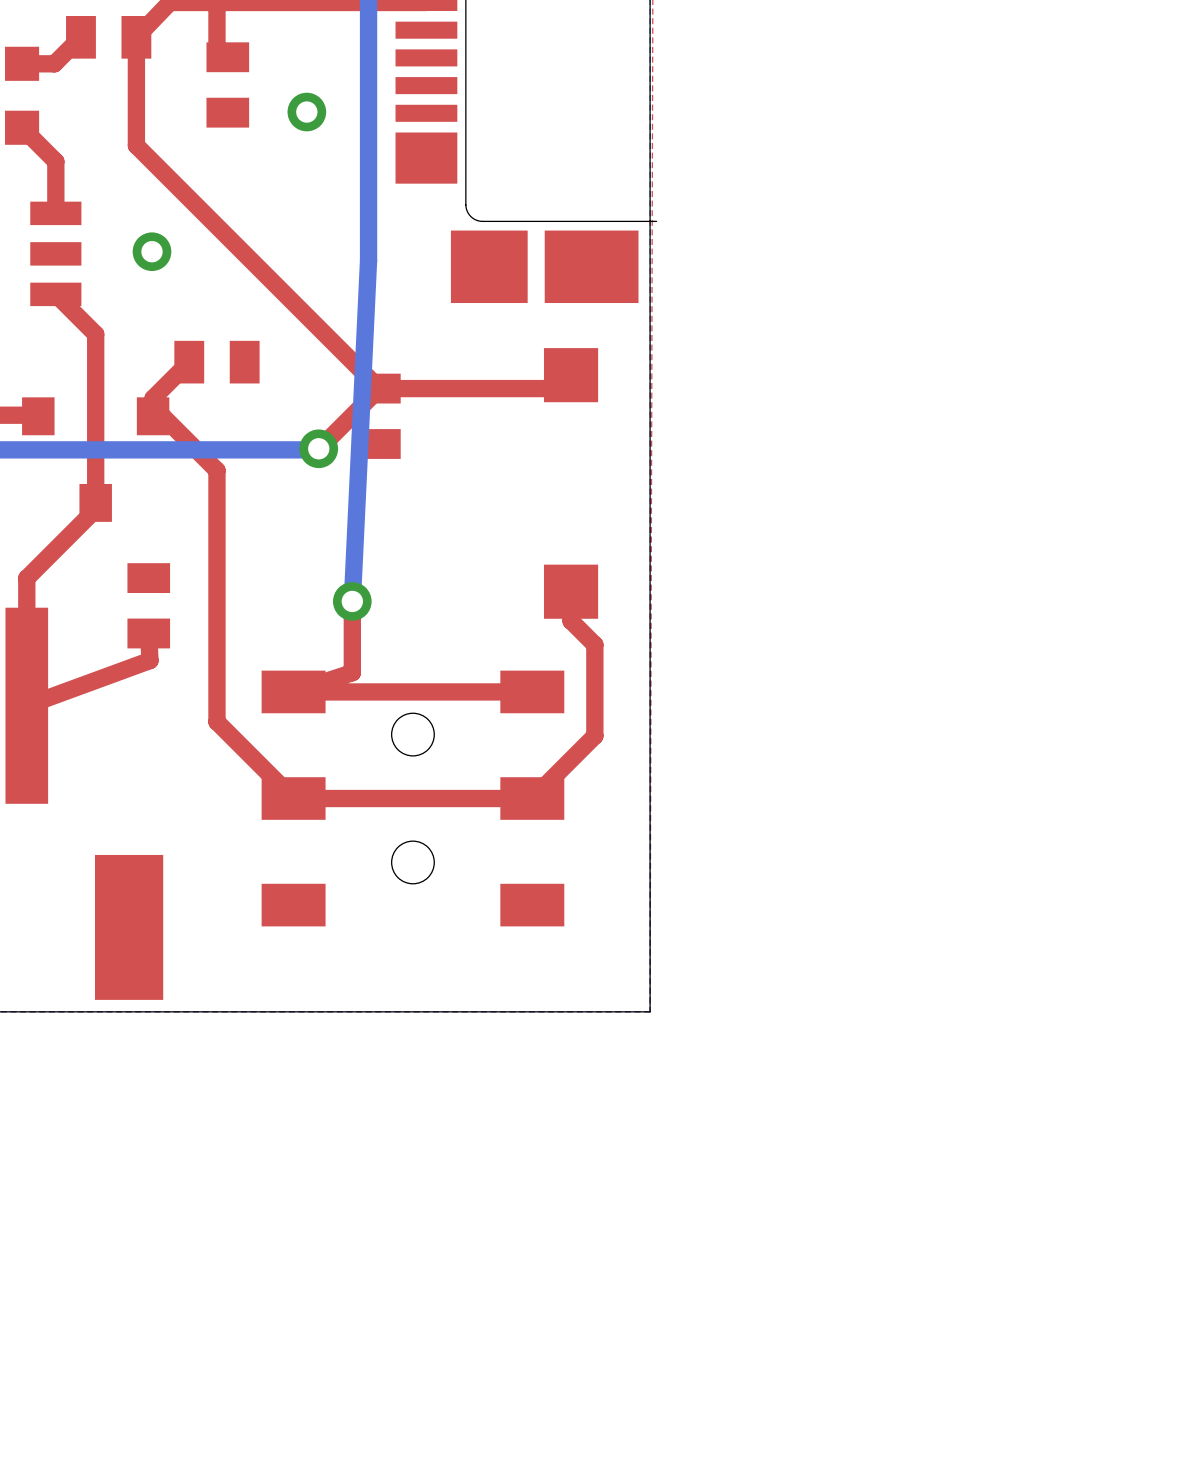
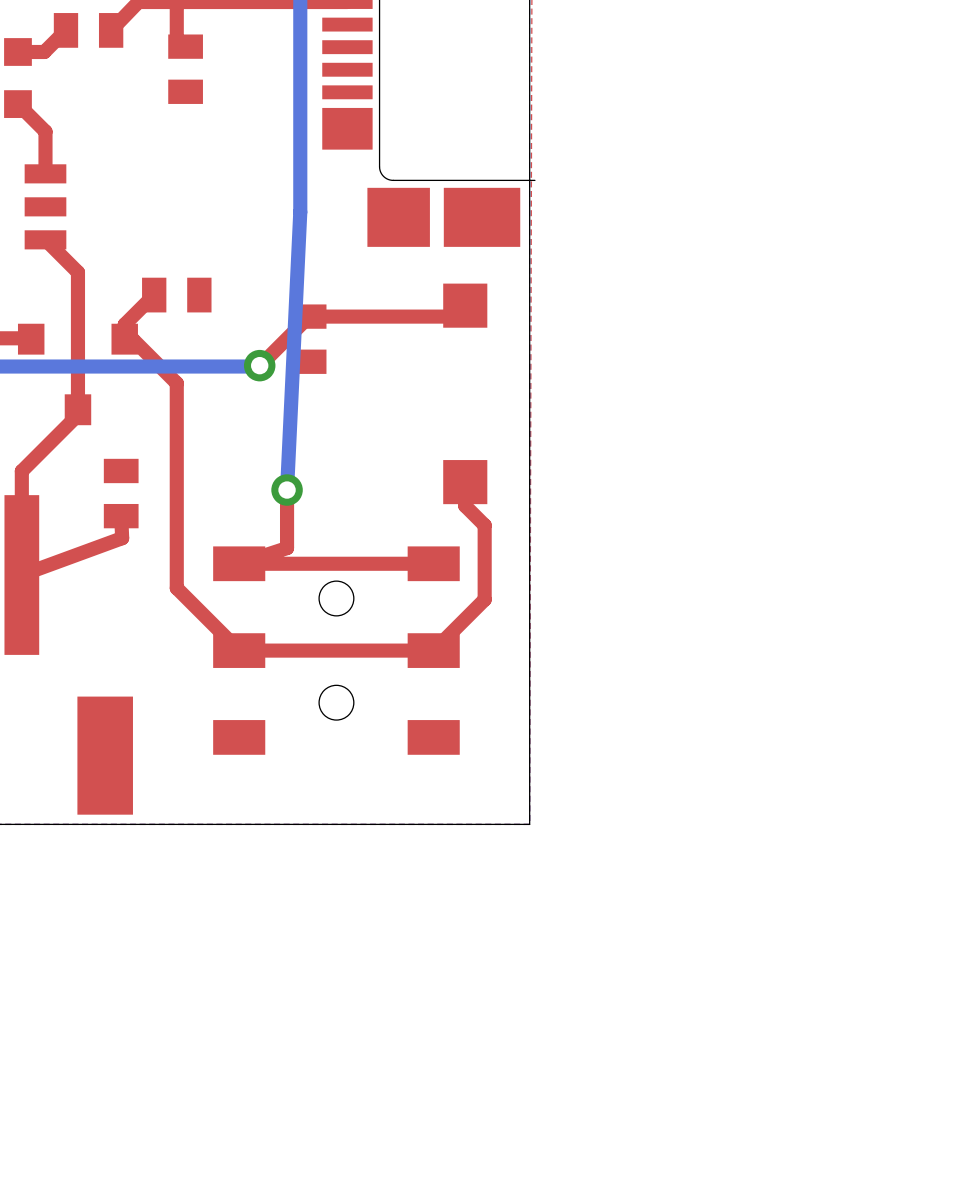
top track: (136, 37) (136, 145) (379, 388) -> none
via: (306, 112) -> none
via: (152, 251) -> none

